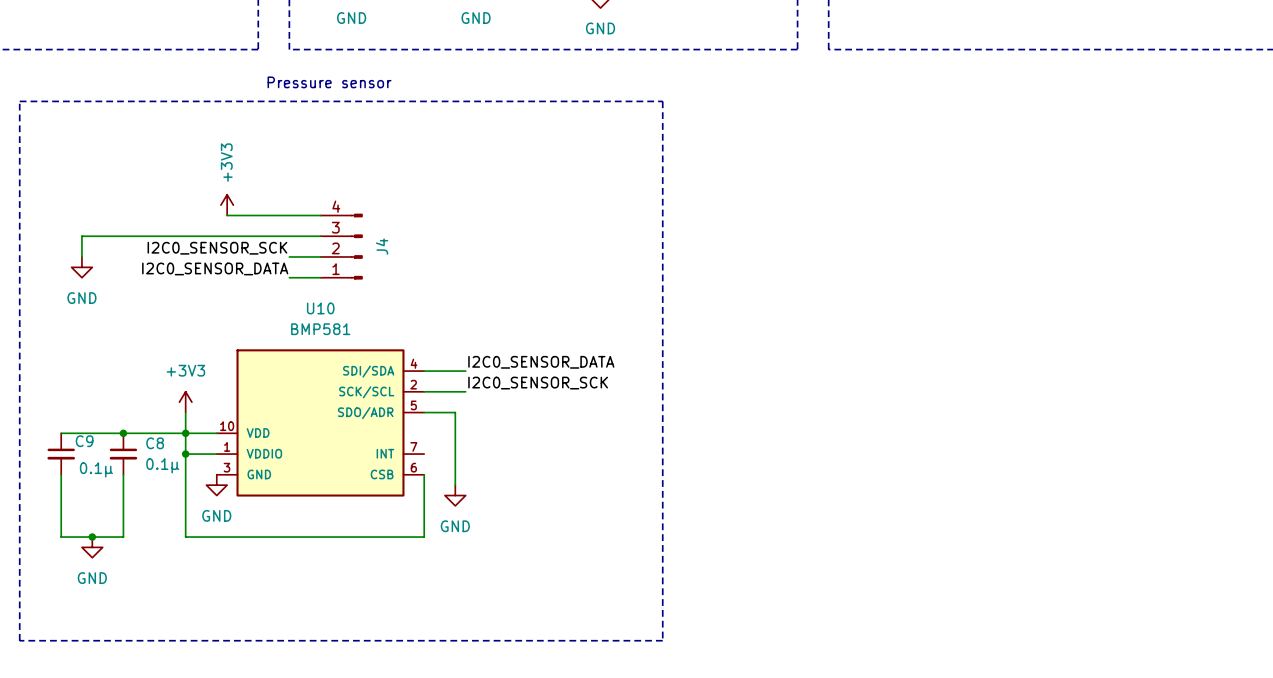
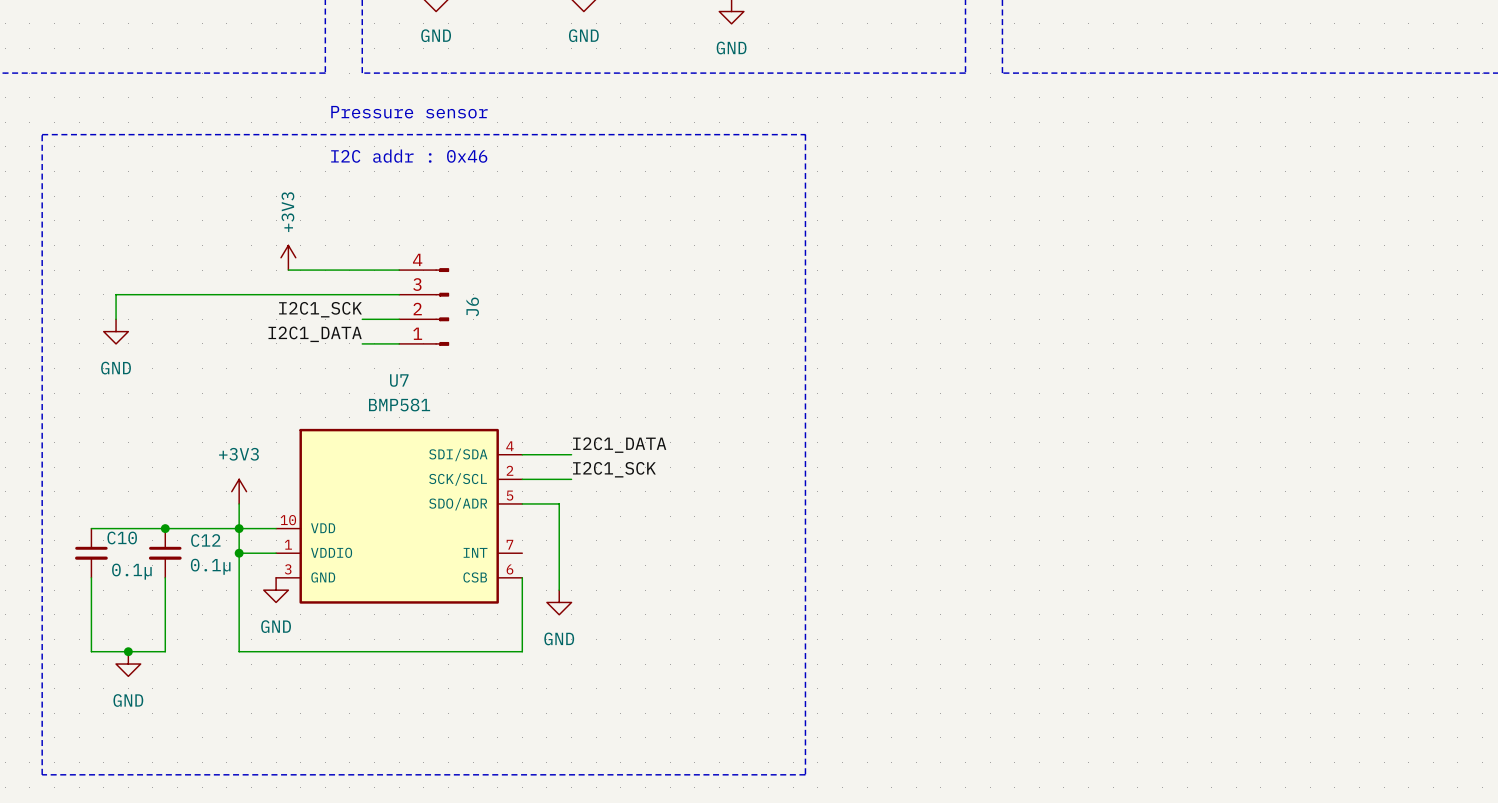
text: none -> I2C addr : 0x46 (409, 156)
J4 name: J4 (382, 246) -> J6 (472, 306)
label: I2C0_SENSOR_SCK (217, 248) -> I2C1_SCK (320, 309)
label: I2C0_SENSOR_DATA (215, 268) -> I2C1_DATA (315, 334)
U10 name: U10 (320, 308) -> U7 (399, 380)
label: I2C0_SENSOR_DATA (541, 362) -> I2C1_DATA (619, 445)
label: I2C0_SENSOR_SCK (538, 383) -> I2C1_SCK (614, 469)
C9 name: C9 (84, 441) -> C10 (122, 537)
C8 name: C8 (155, 443) -> C12 (205, 540)

